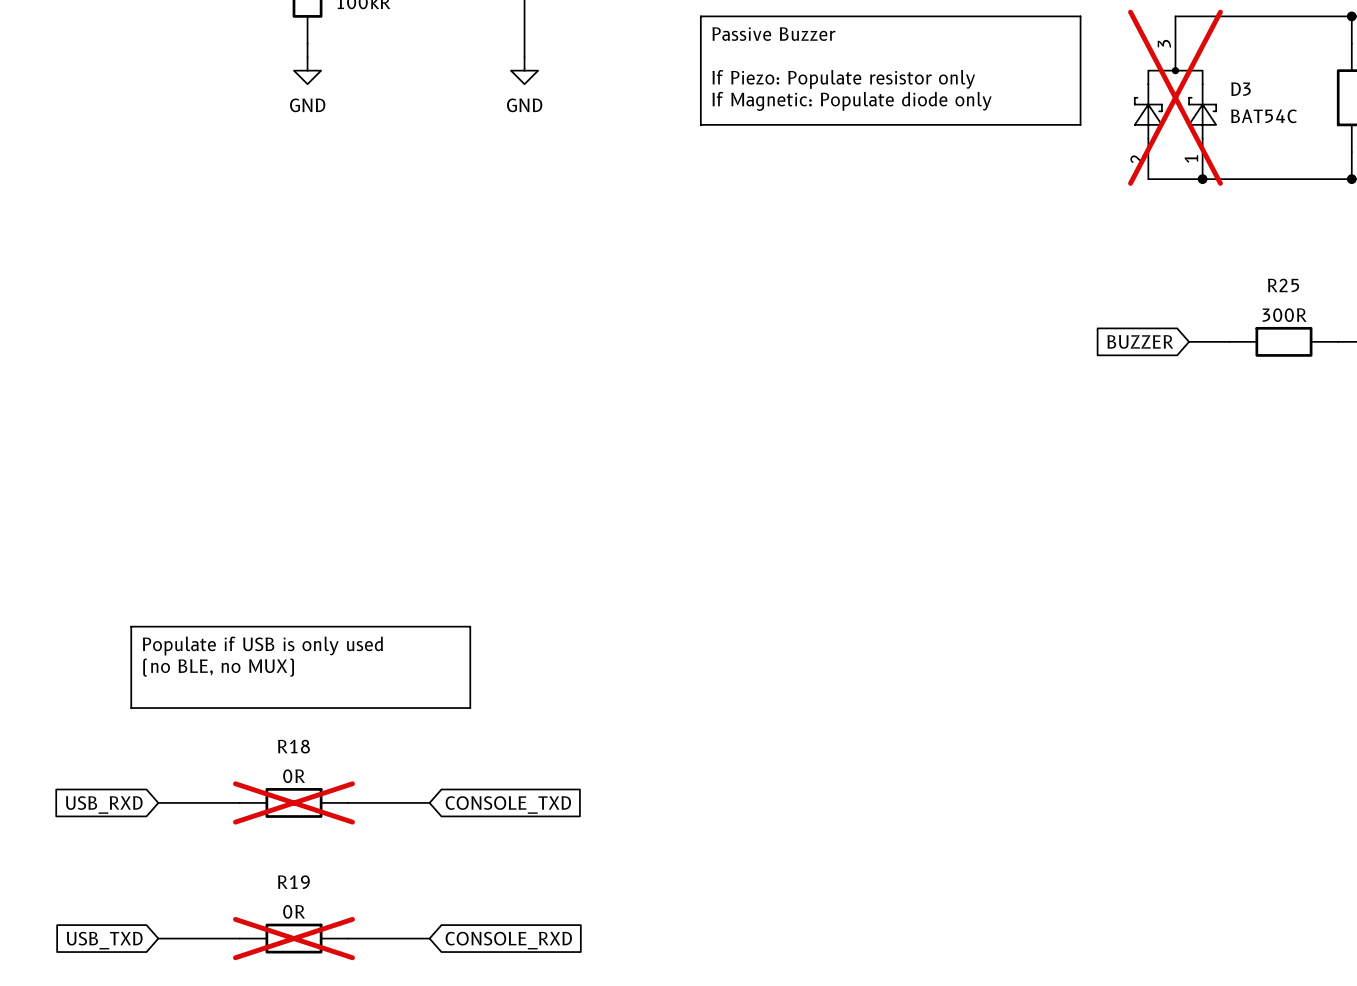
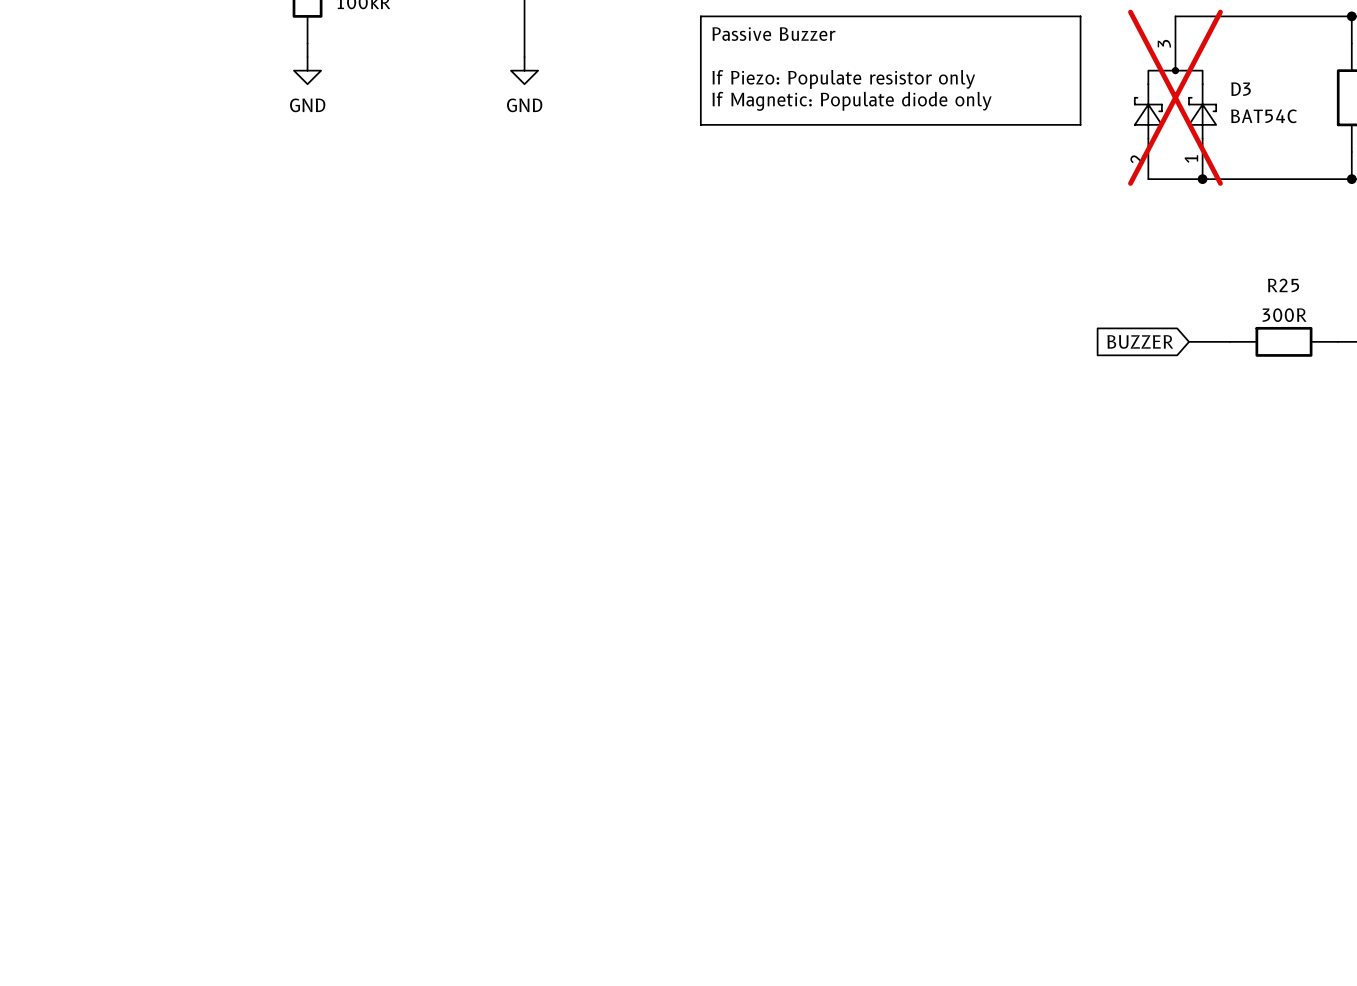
line: (131, 626) (470, 626) (470, 708) (131, 708) (131, 626) -> none
text: Populate if USB is only used (262, 646) -> none
text: (no BLE, no MUX) (218, 667) -> none
wire: (158, 802) (239, 802) -> none
R18: 0R (293, 802) -> none
wire: (348, 802) (429, 802) -> none
global label: USB_RXD (104, 804) -> none
global label: CONSOLE_TXD (508, 804) -> none
wire: (158, 938) (239, 938) -> none
R19: 0R (293, 938) -> none
wire: (348, 938) (429, 938) -> none
global label: USB_TXD (104, 940) -> none
global label: CONSOLE_RXD (508, 940) -> none

